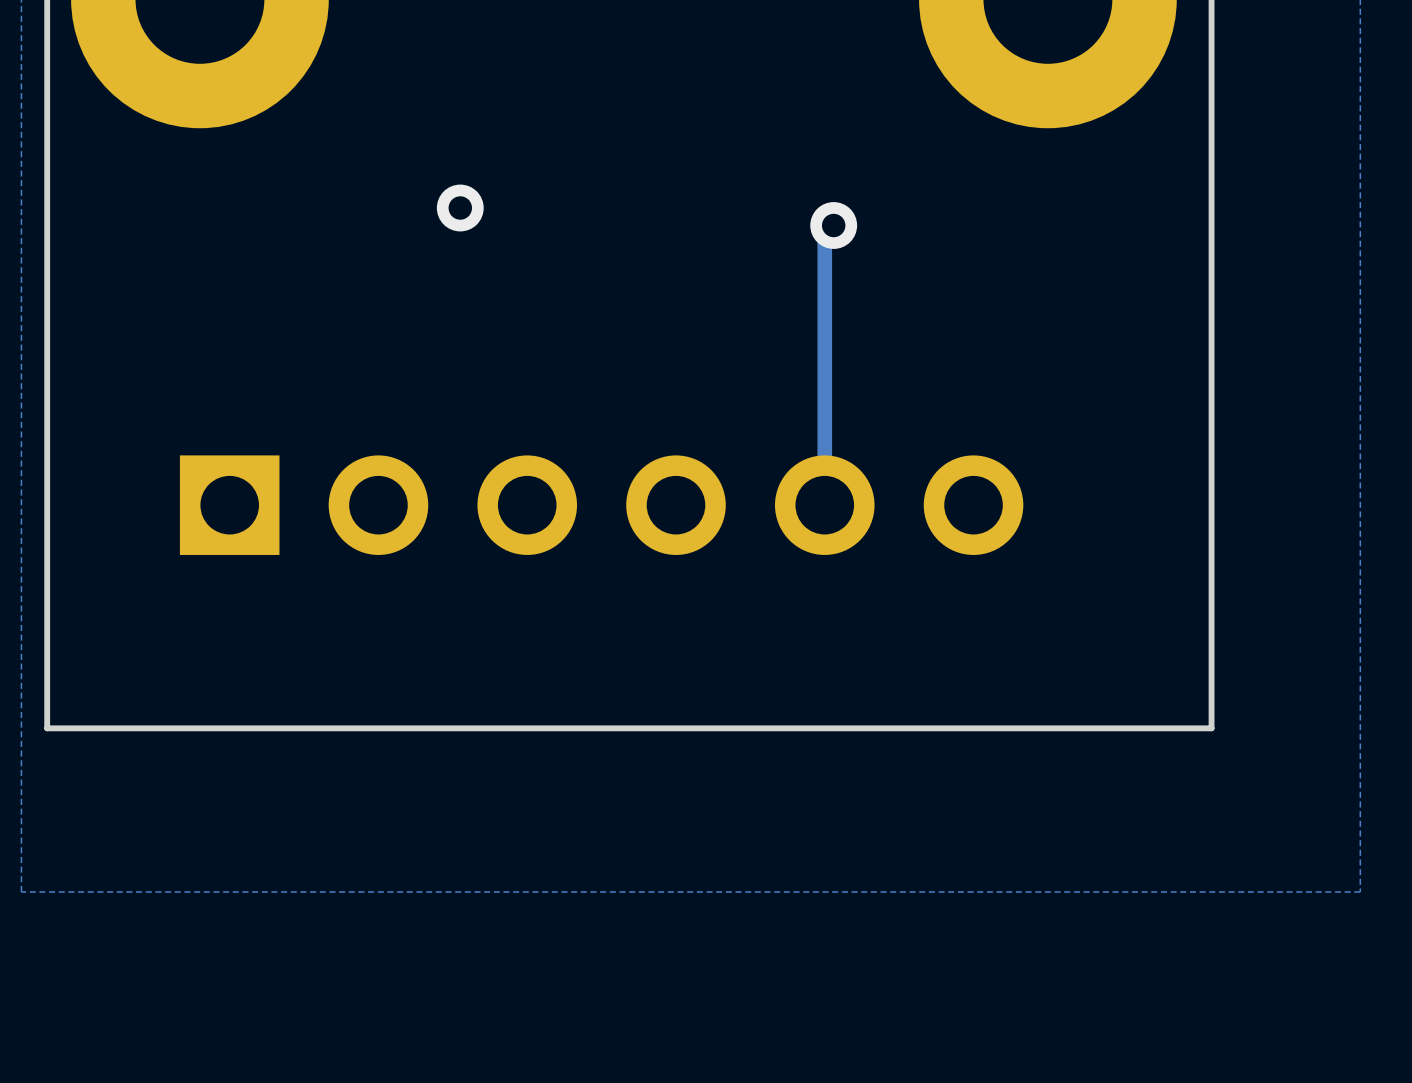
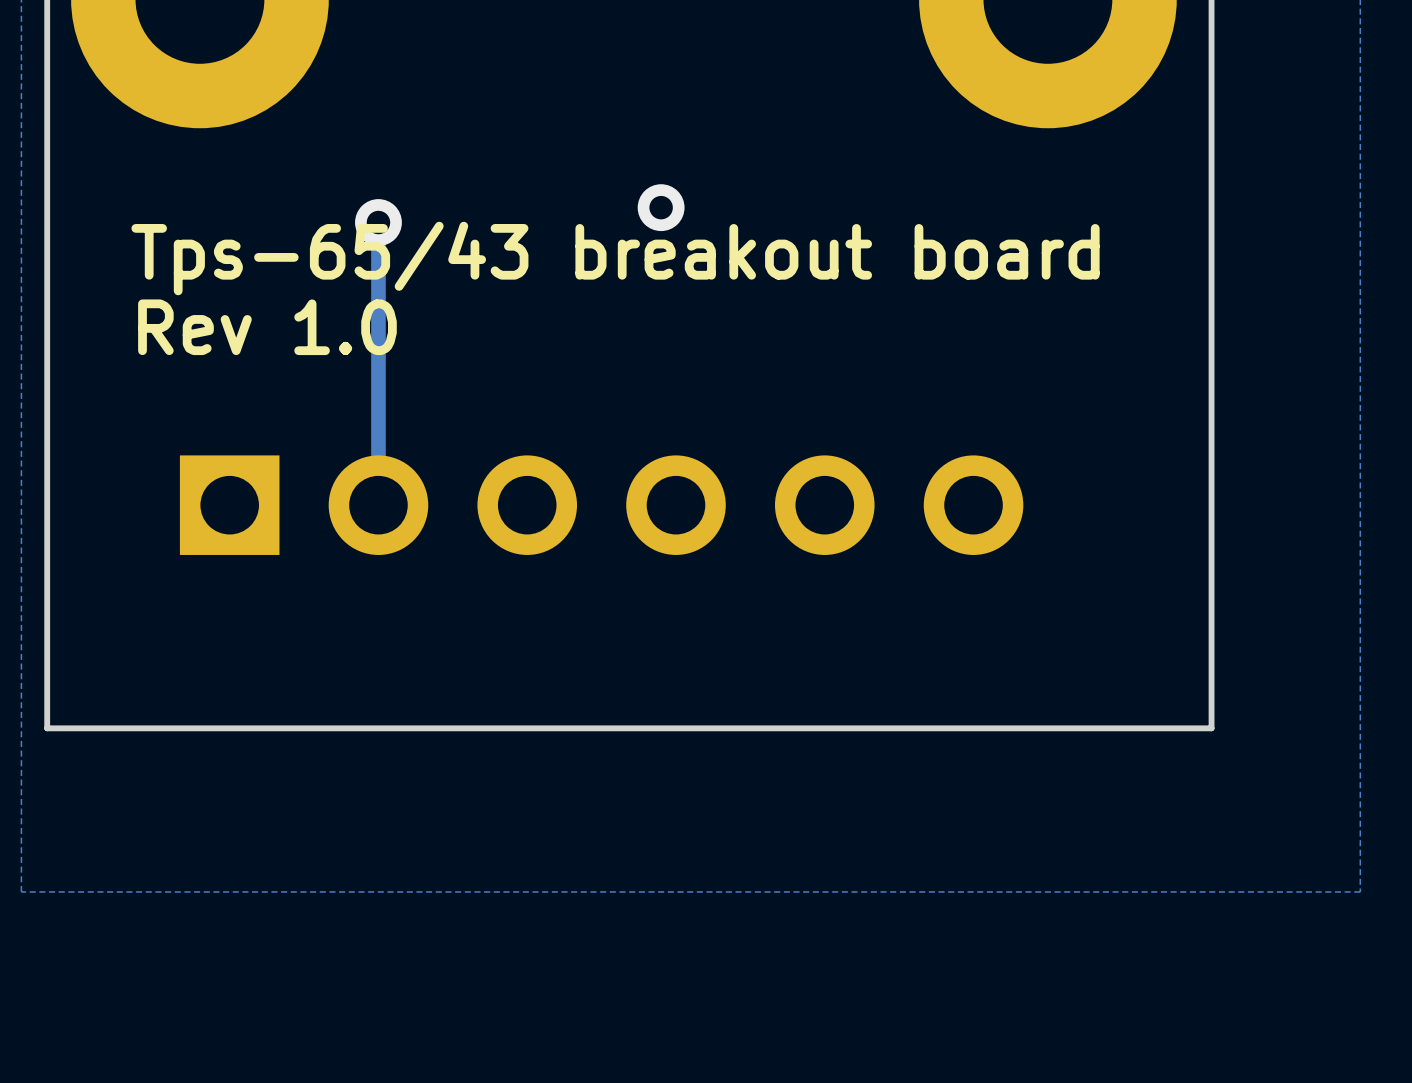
via: none -> (661, 207)
via position: (460, 208) -> (378, 222)
track: none -> (378, 222) (378, 505)
track: (833, 225) (824, 234) (824, 490) -> none
via: (833, 225) -> none
text: none -> Tps-65/43 breakout board (615, 258)
text: none -> Rev 1.0 (267, 327)

